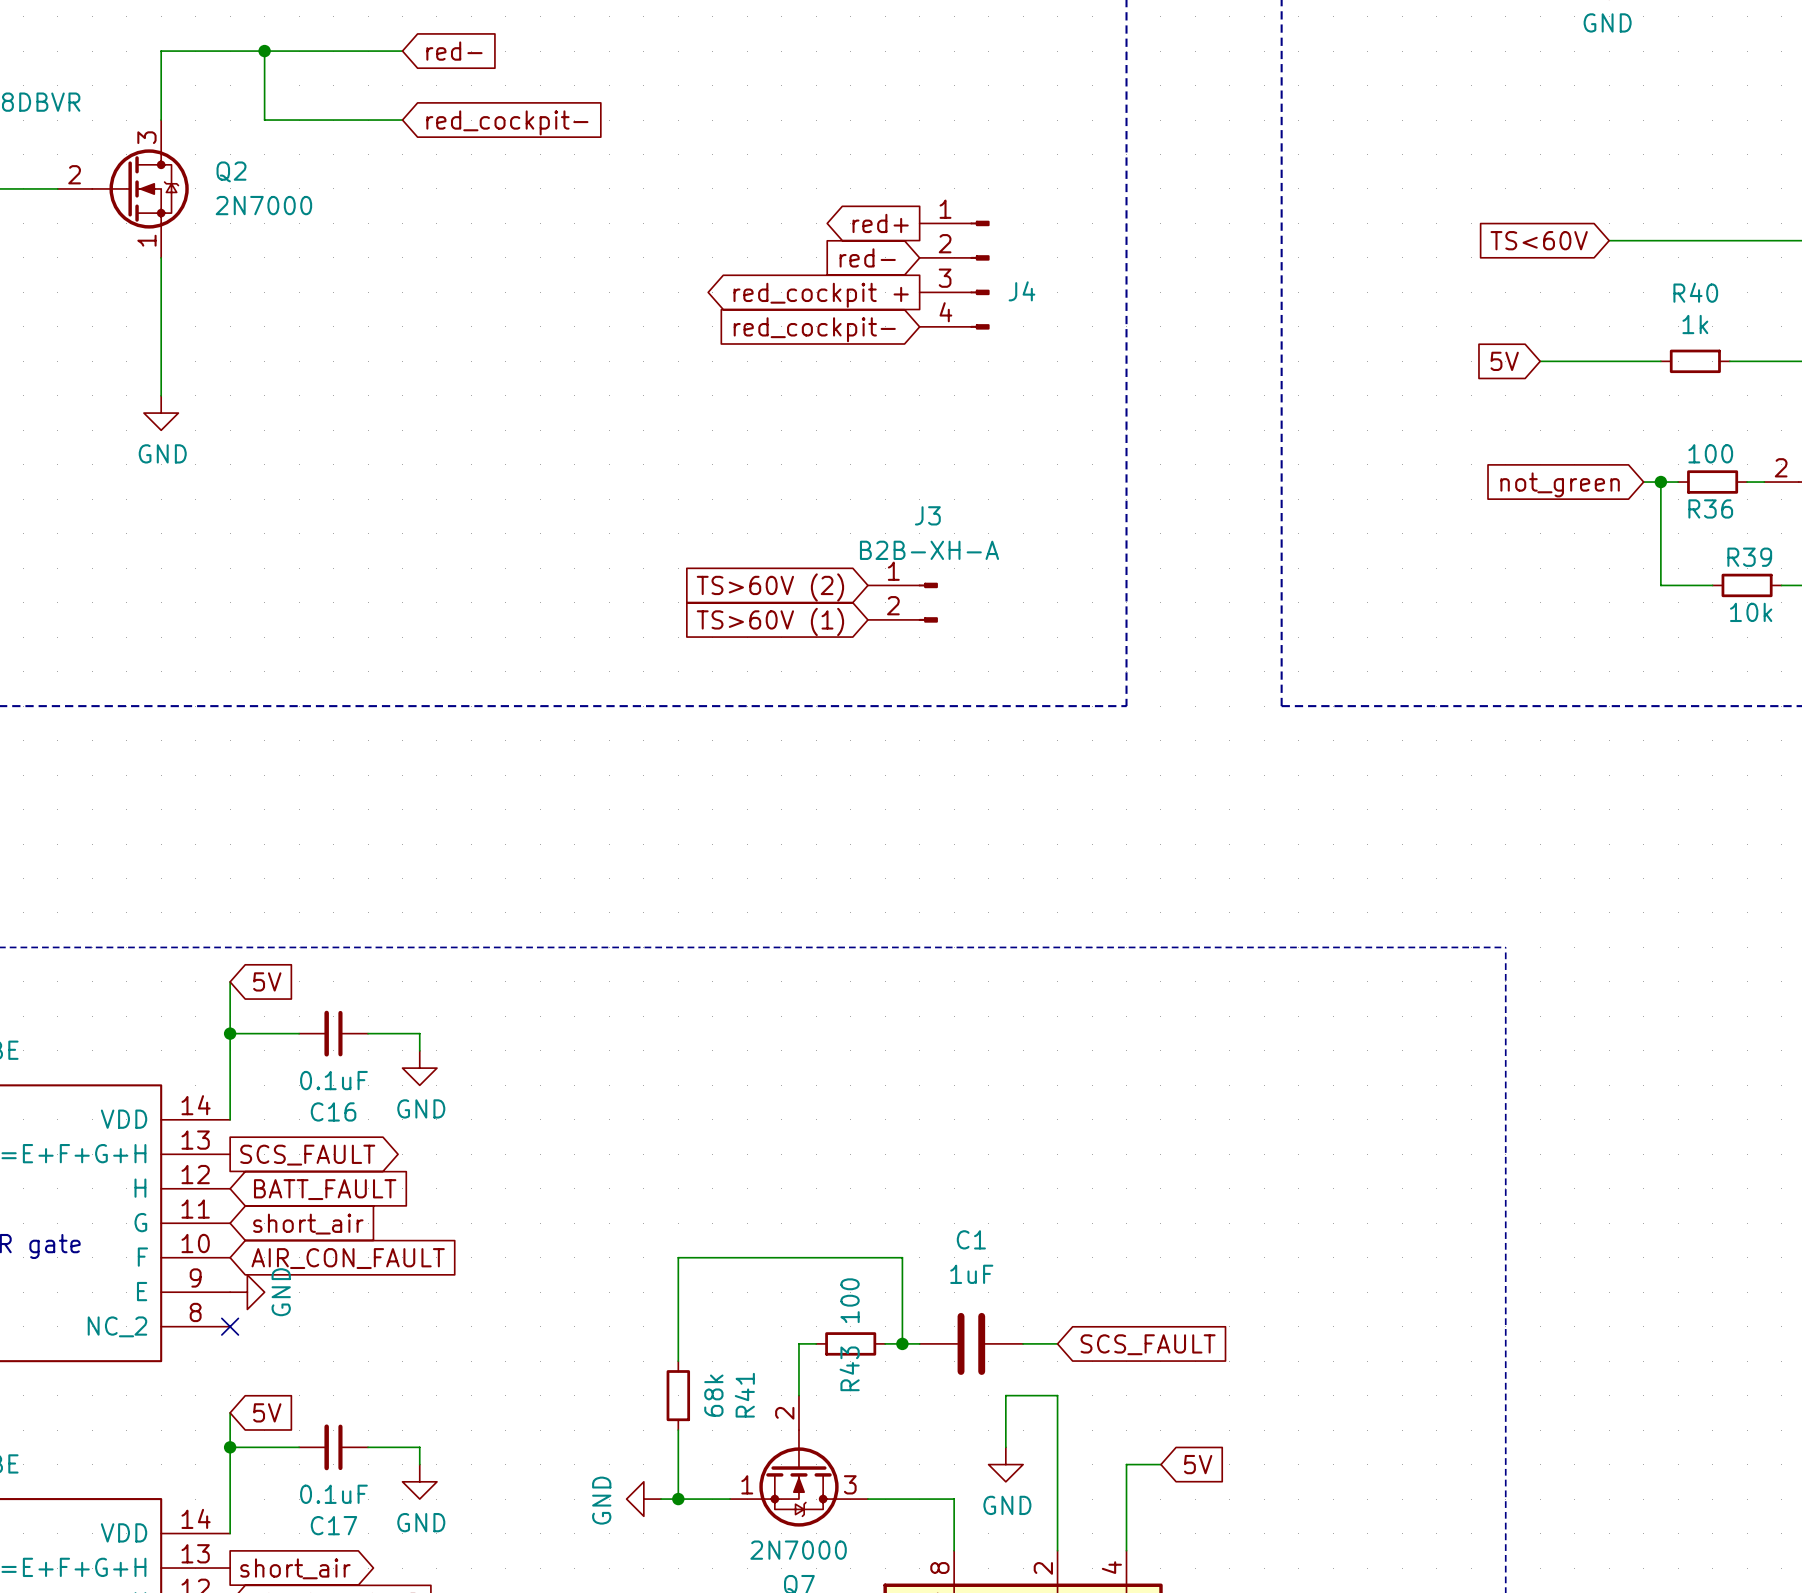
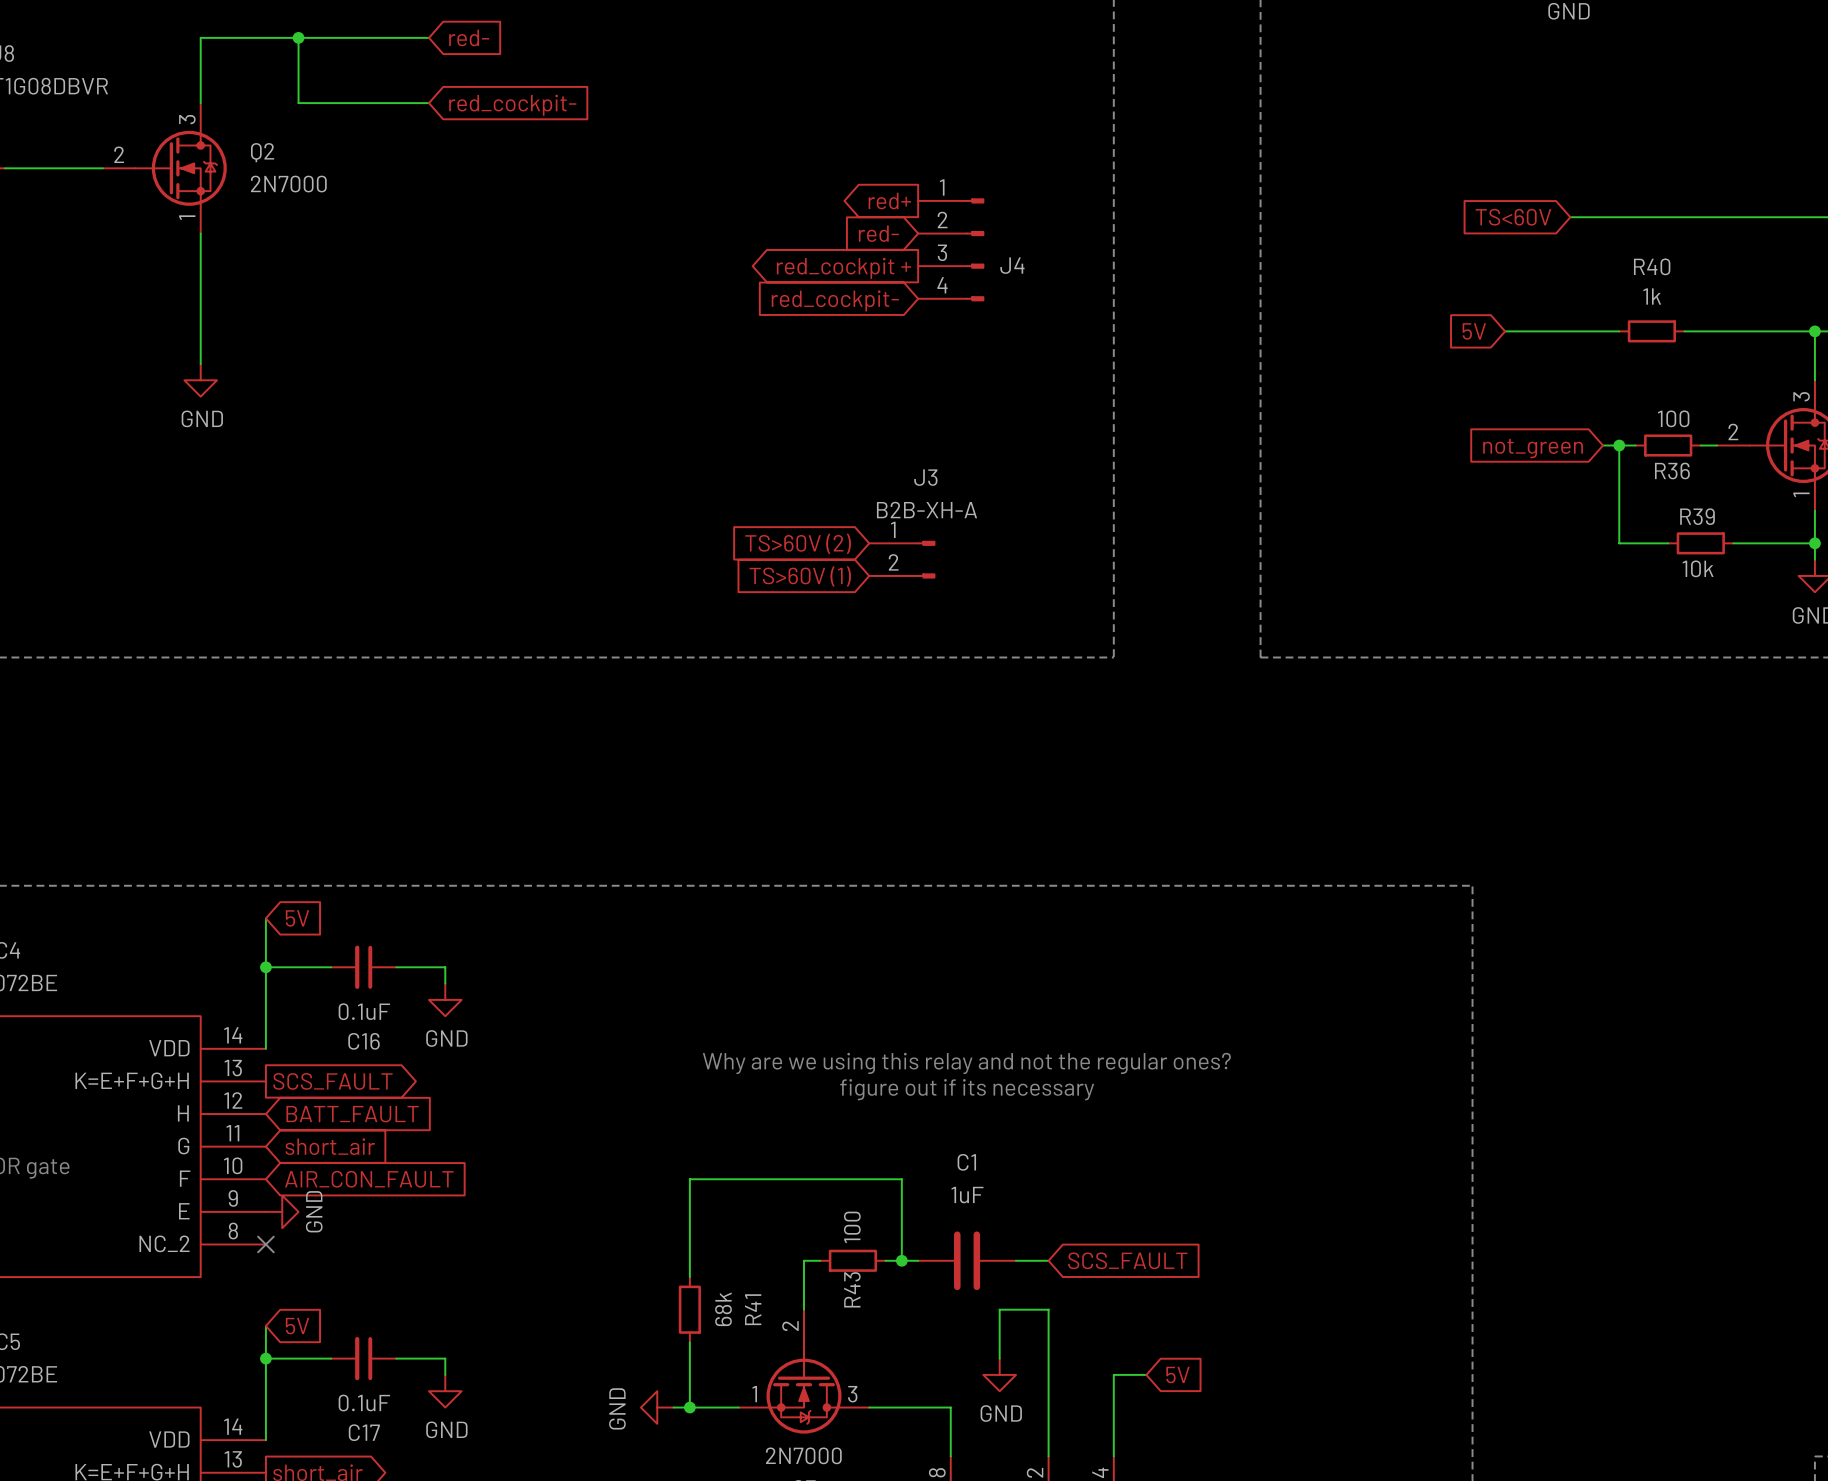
text: none -> Why are we using this relay and not the regular ones? (966, 1063)
text: none -> figure out if its necessary (967, 1089)

